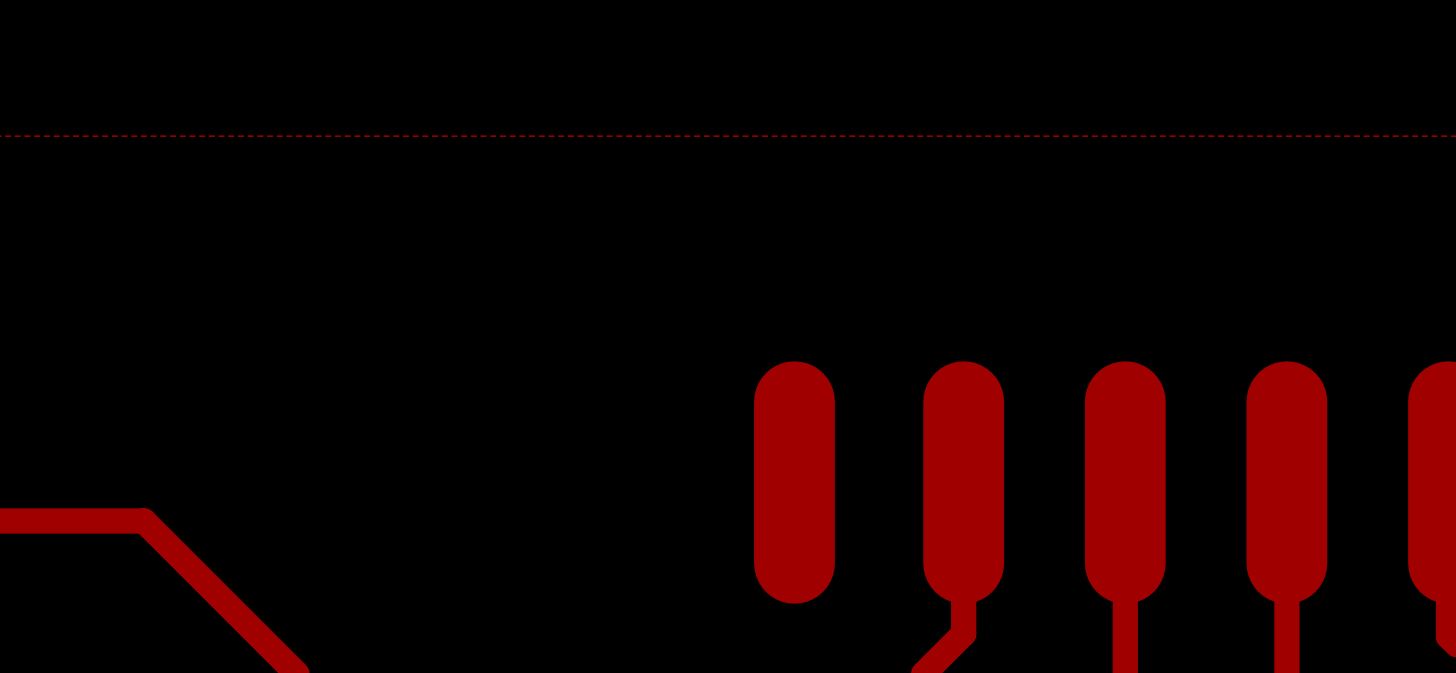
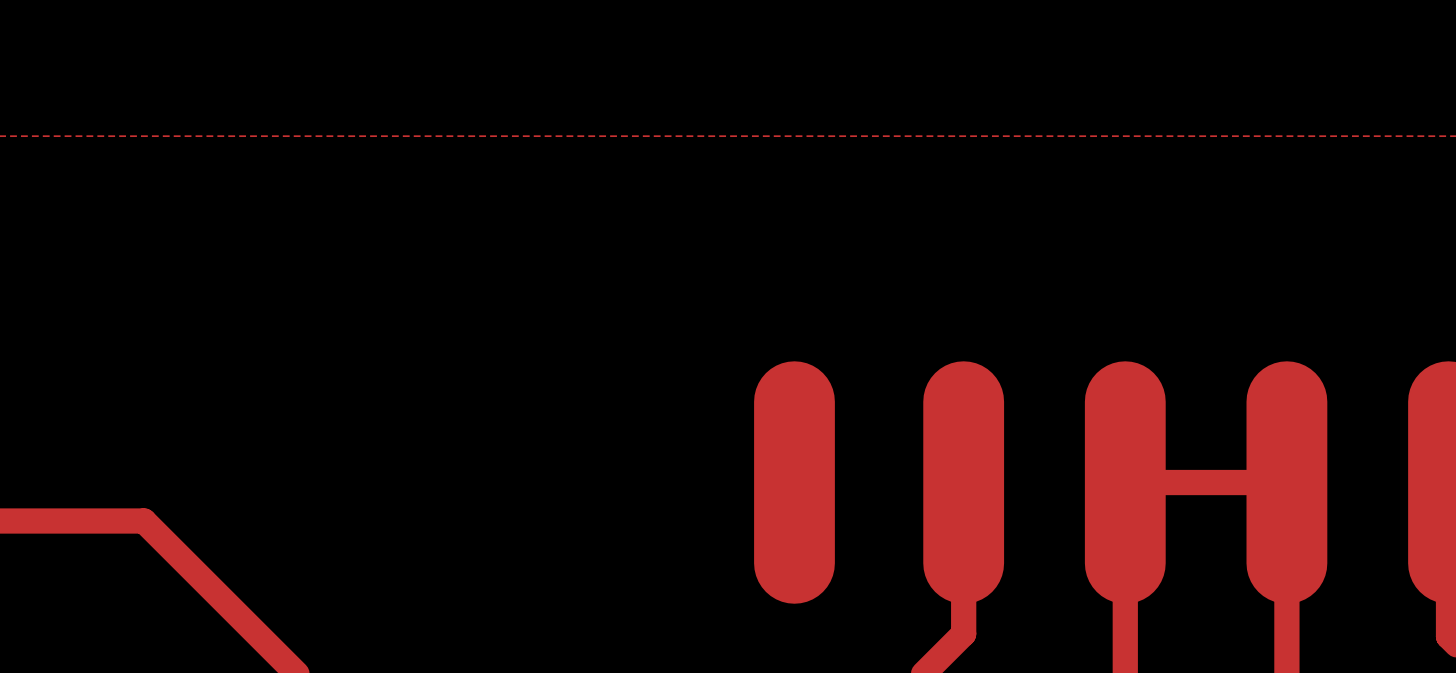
top track: none -> (1286, 482) (1125, 482)

